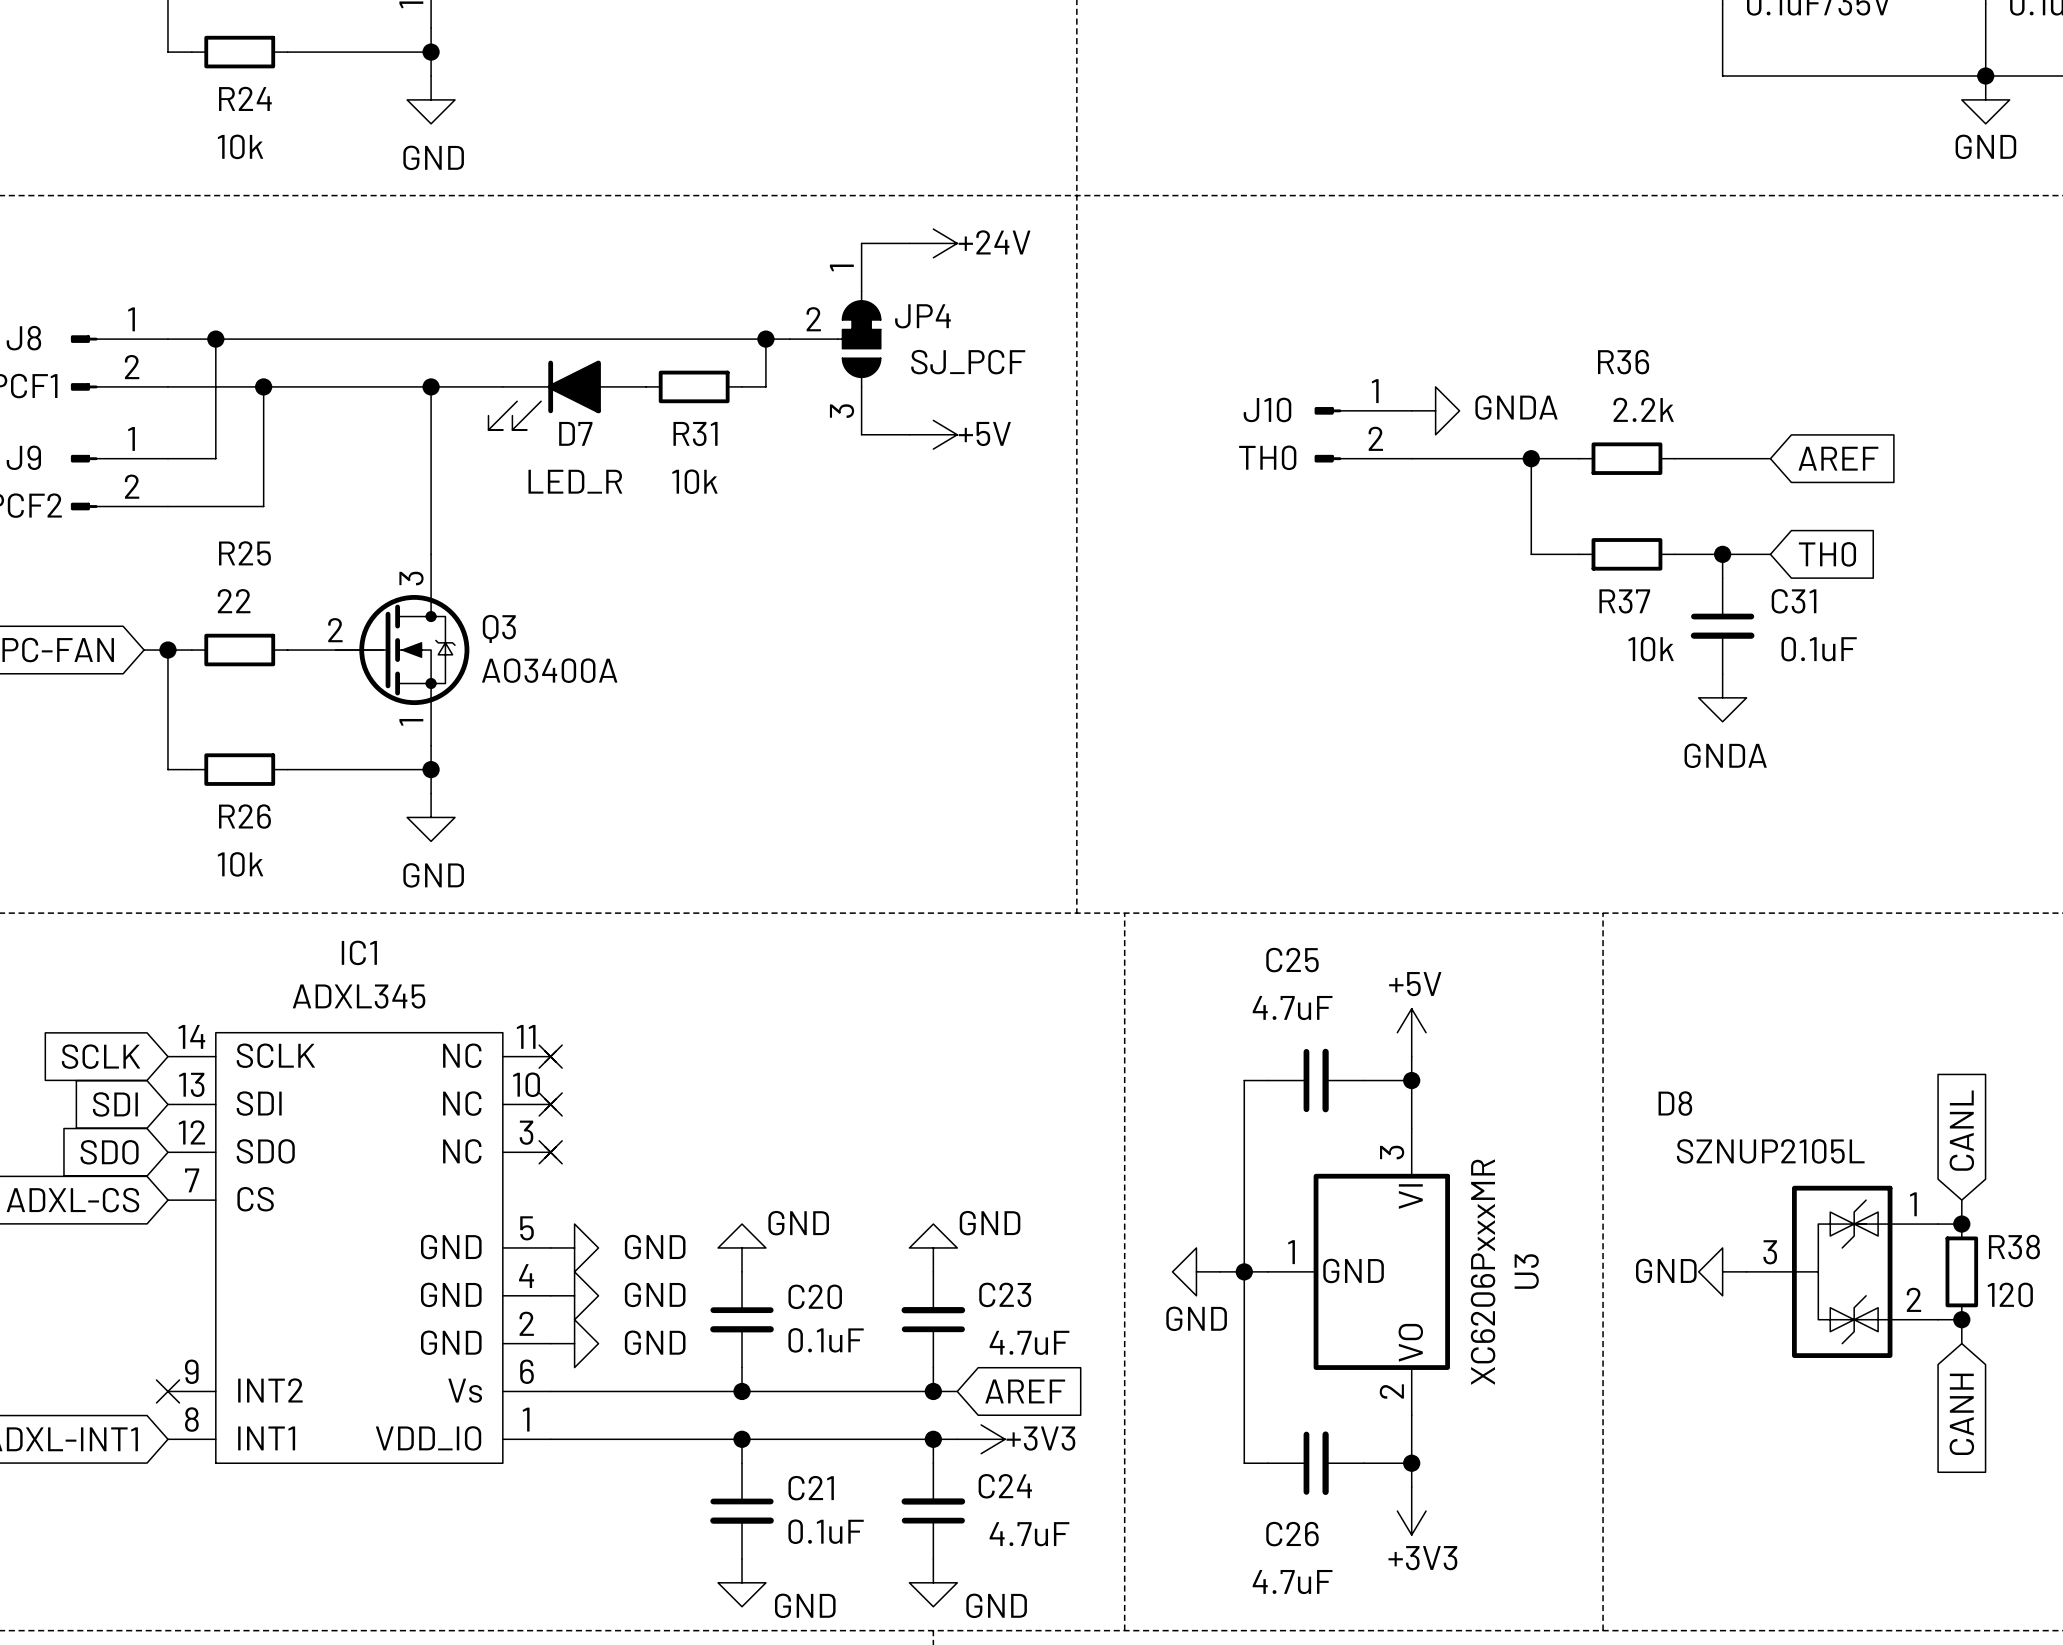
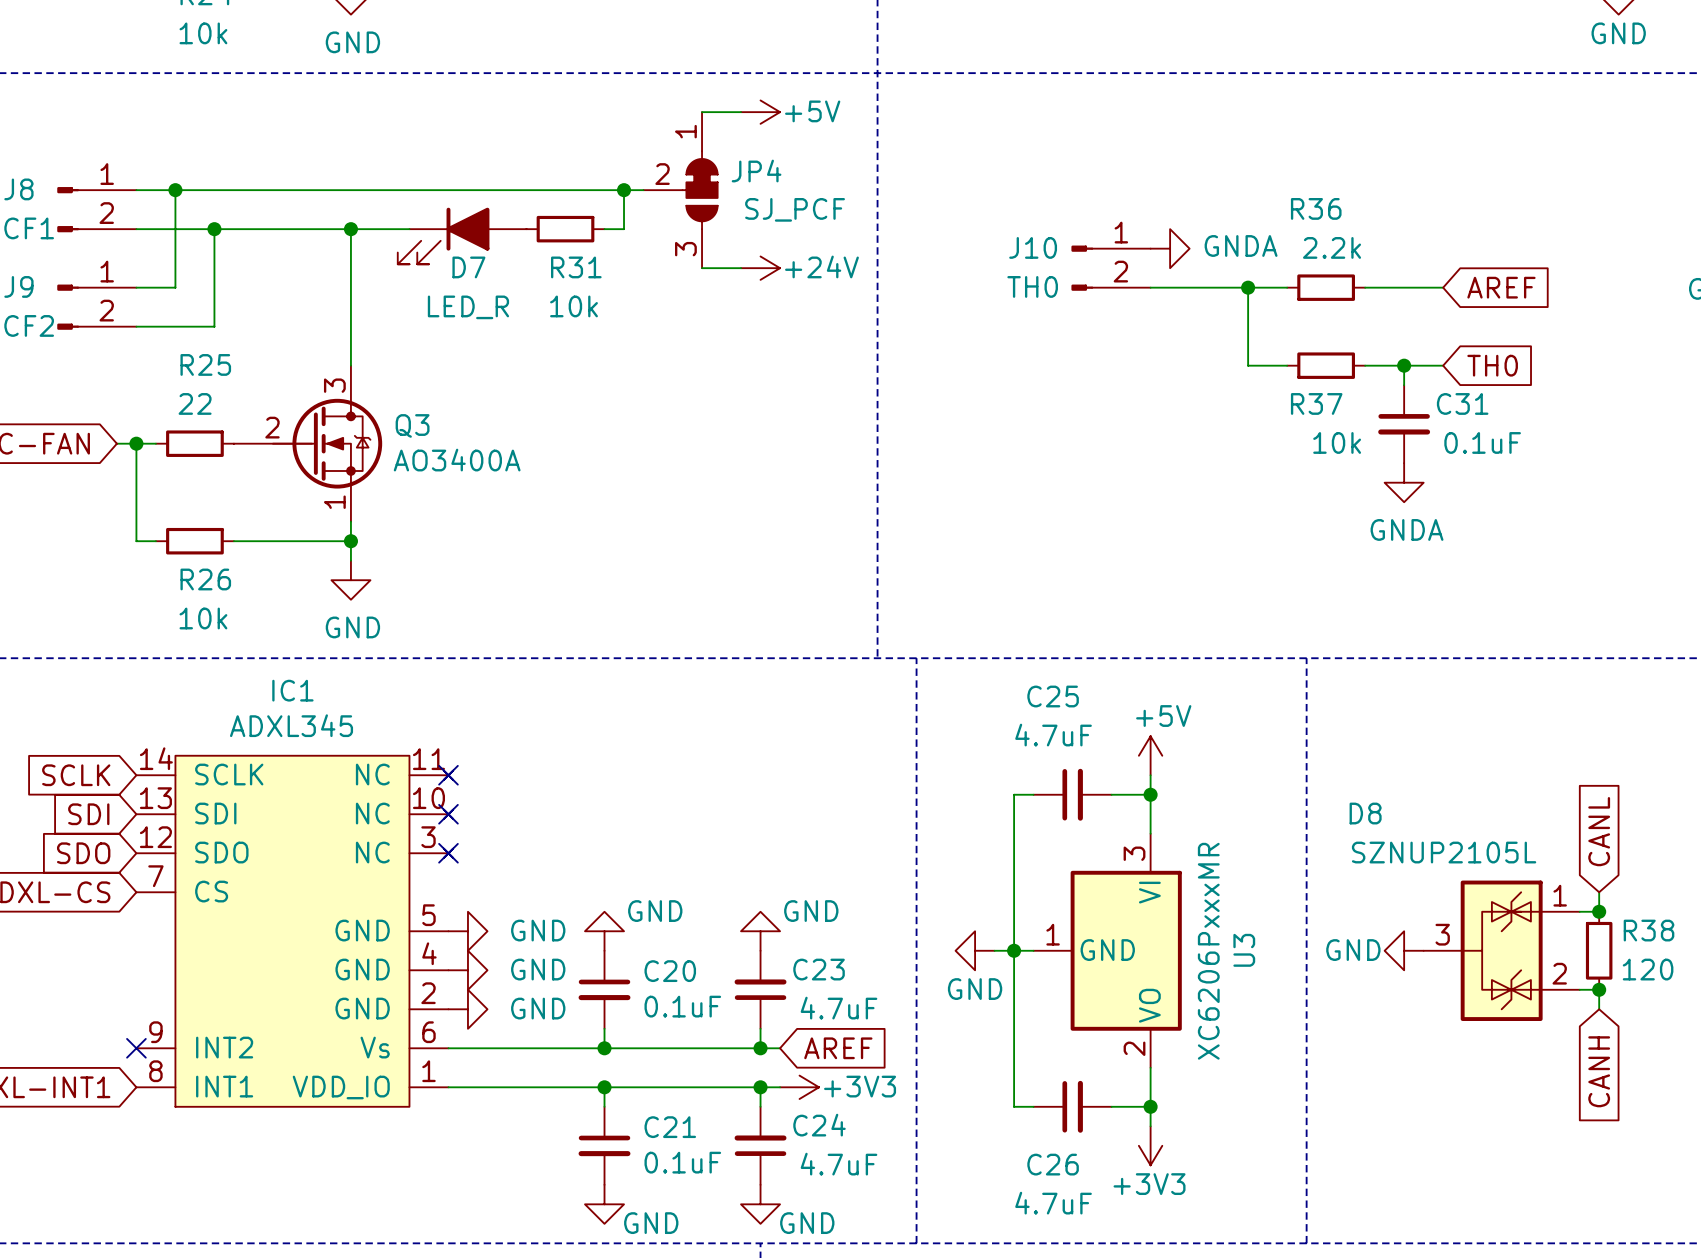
power symbol: +24V (933, 243) -> +5V (760, 112)
power symbol: +5V (933, 434) -> +24V (760, 268)

